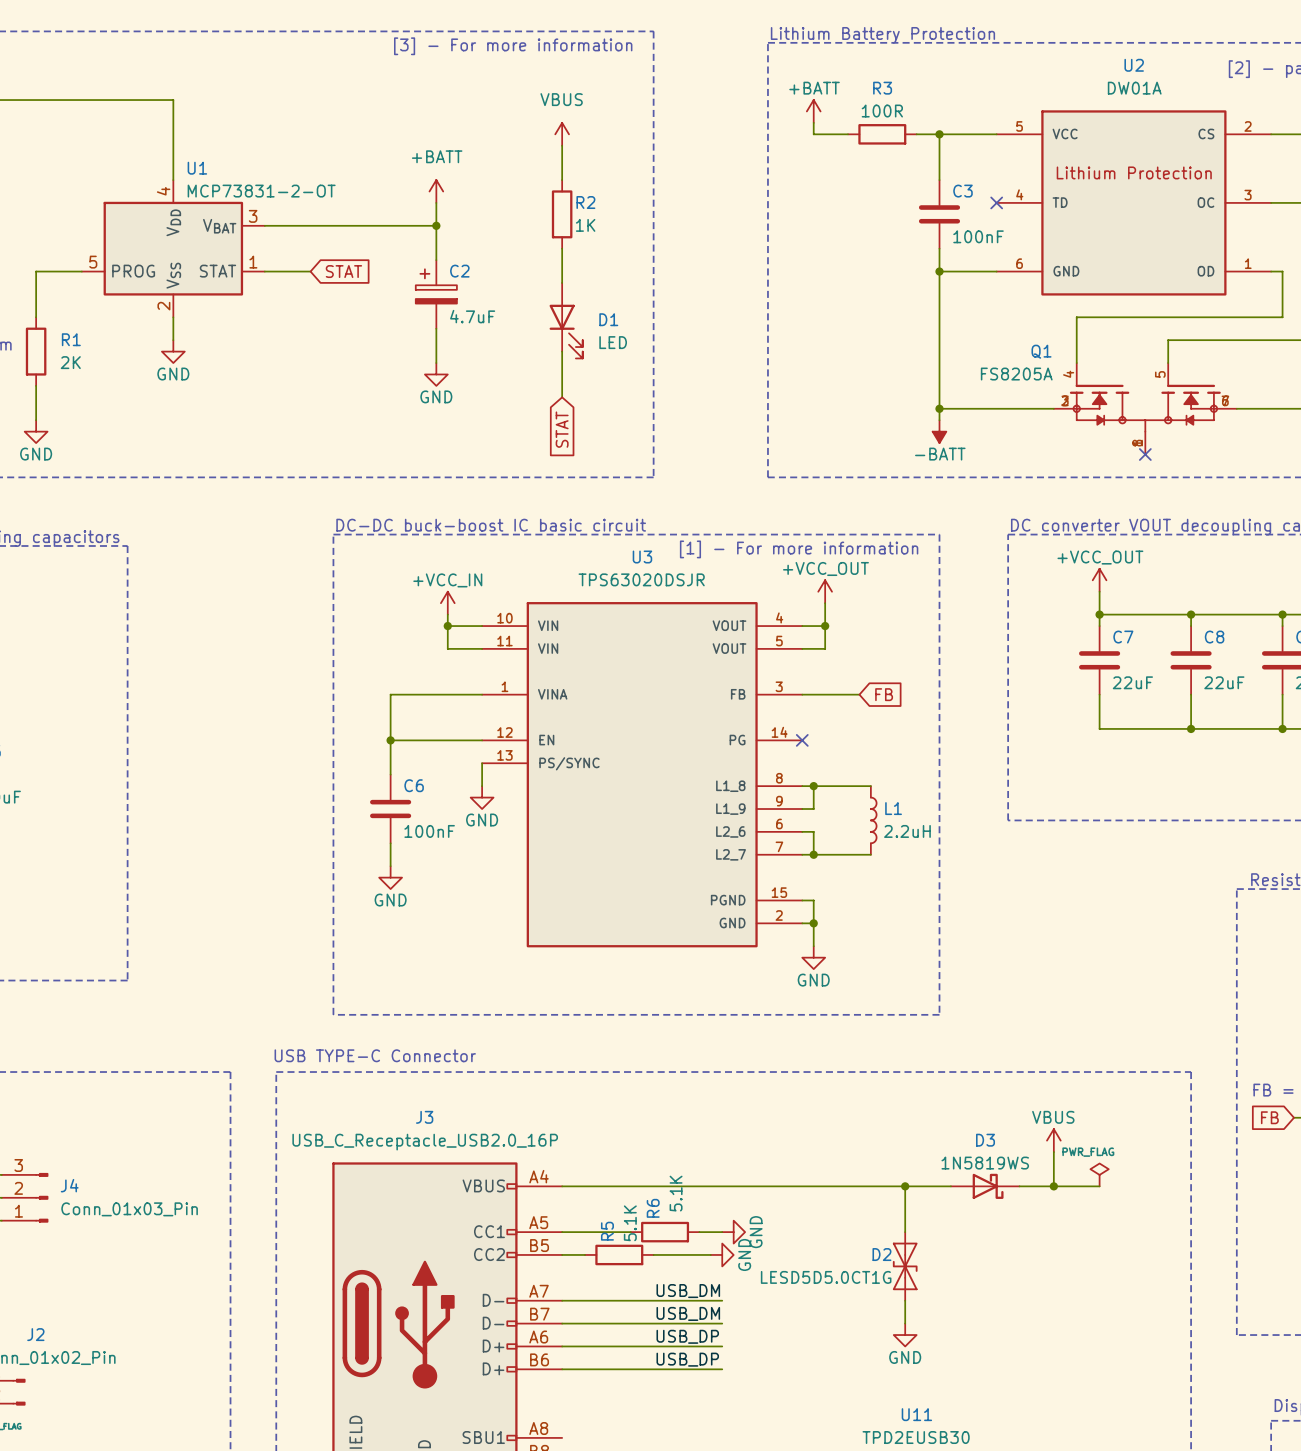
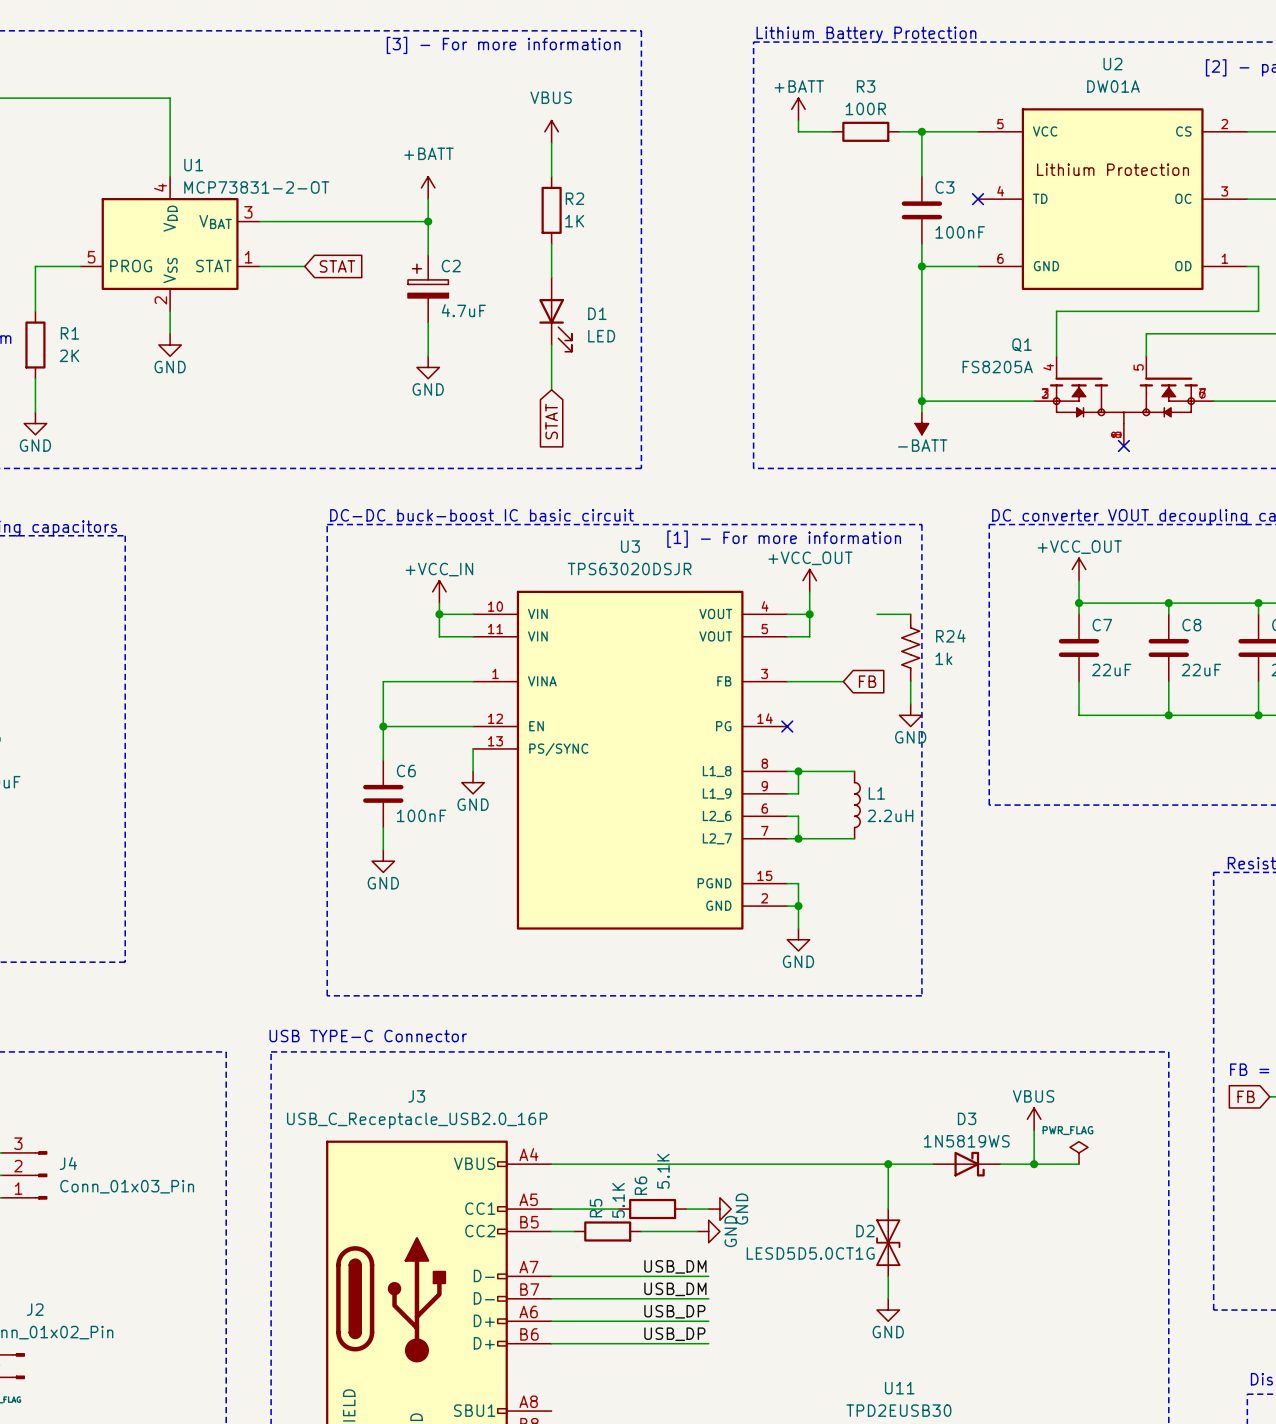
wire: none -> (877, 614) (910, 614)
R24: none -> 1k (910, 647)
wire: none -> (910, 681) (910, 704)
power symbol: none -> GND (910, 715)

